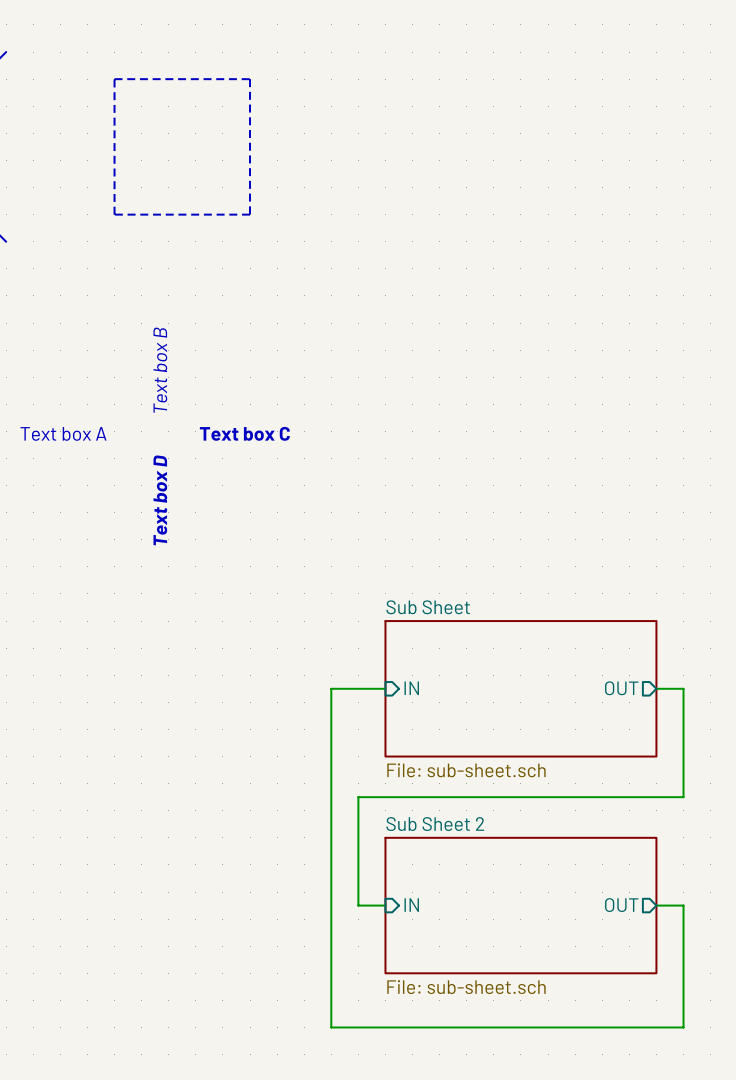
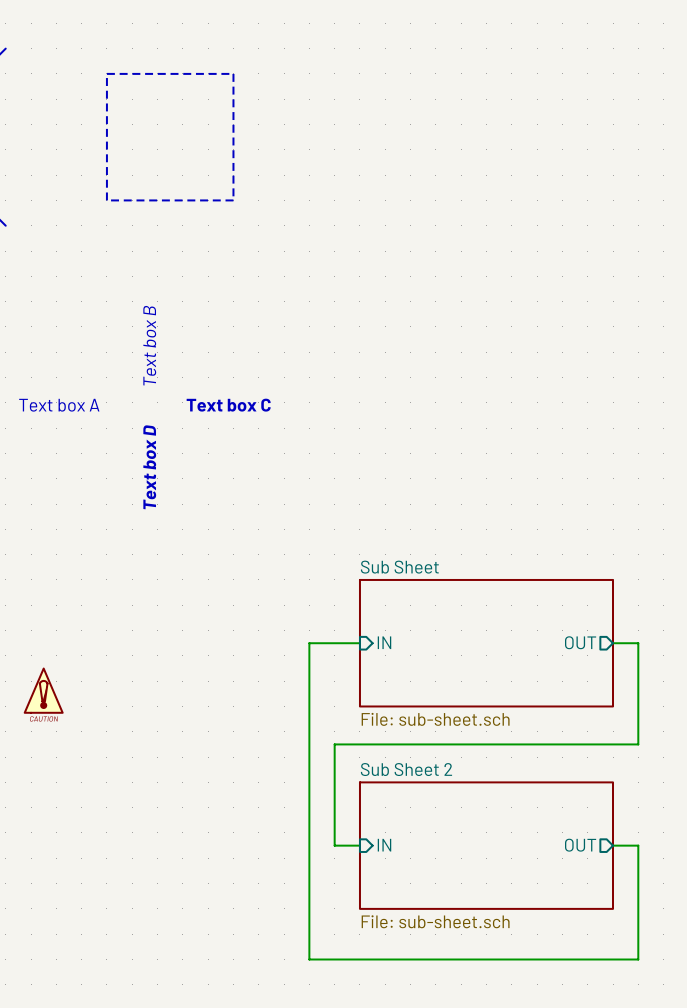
power symbol: none -> (43, 690)

